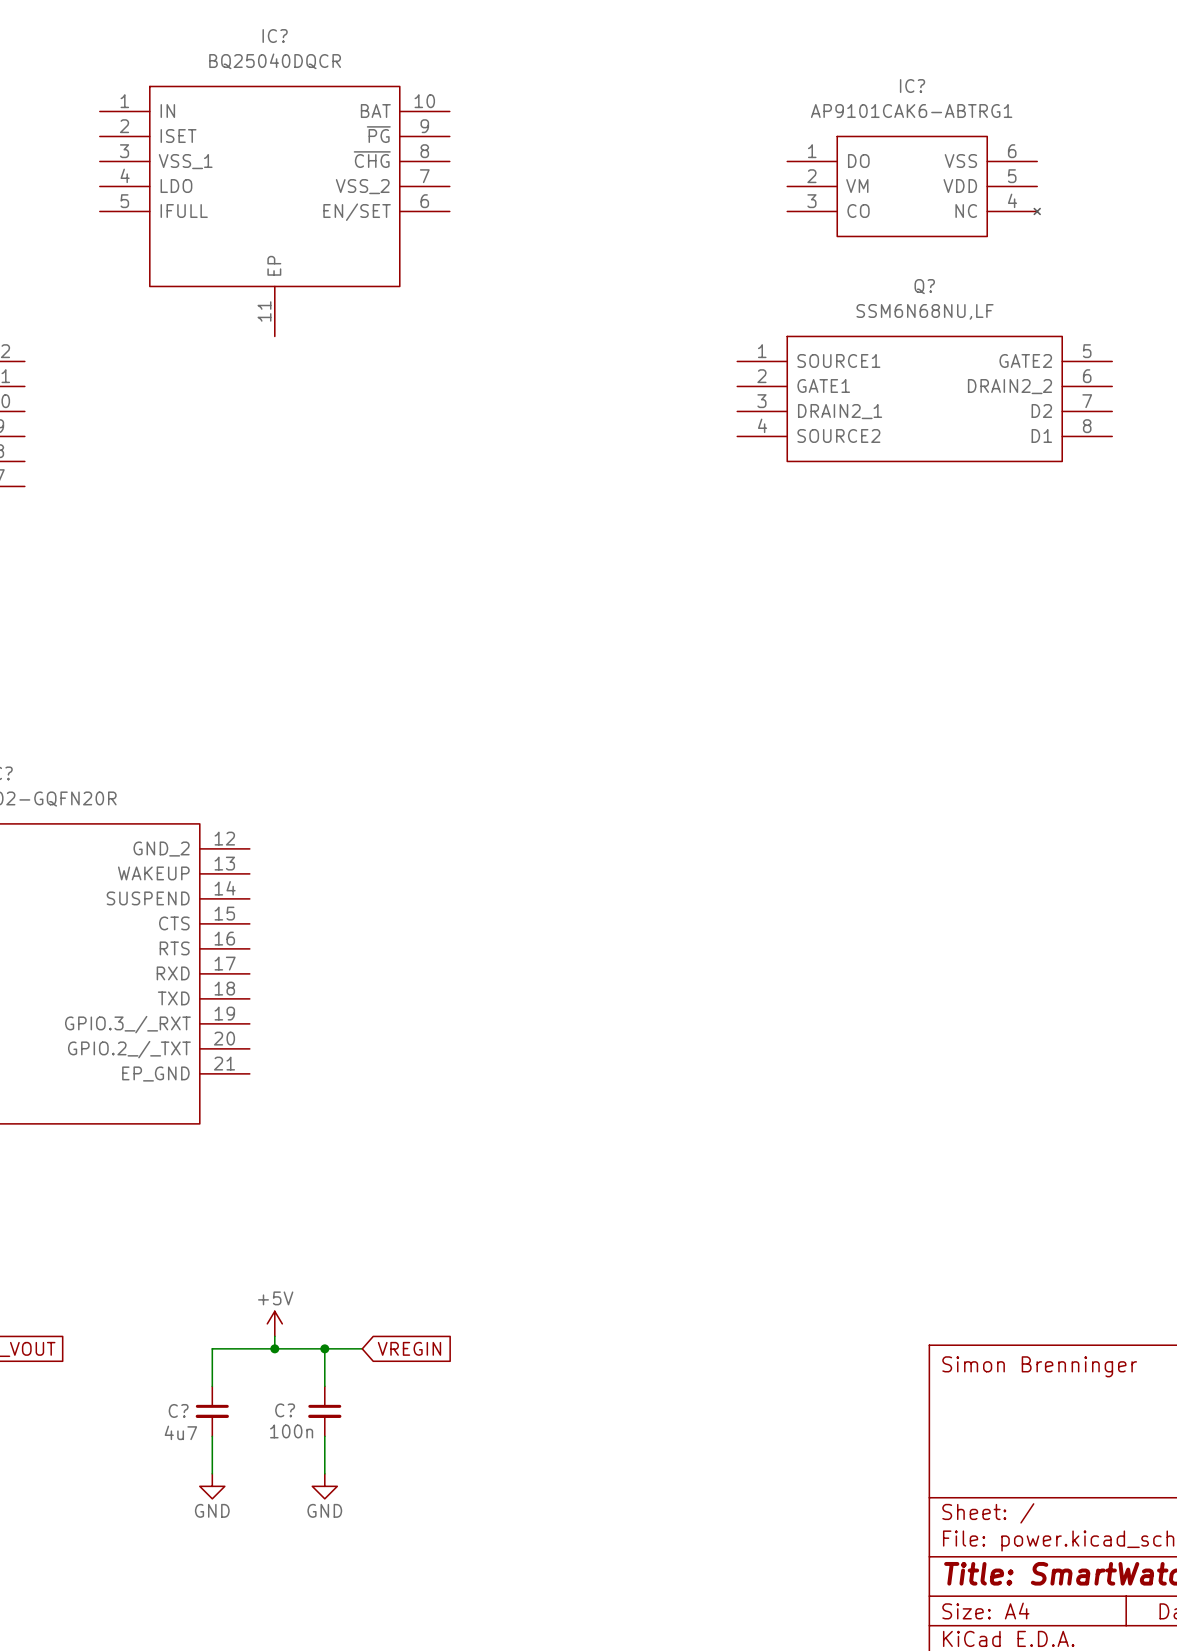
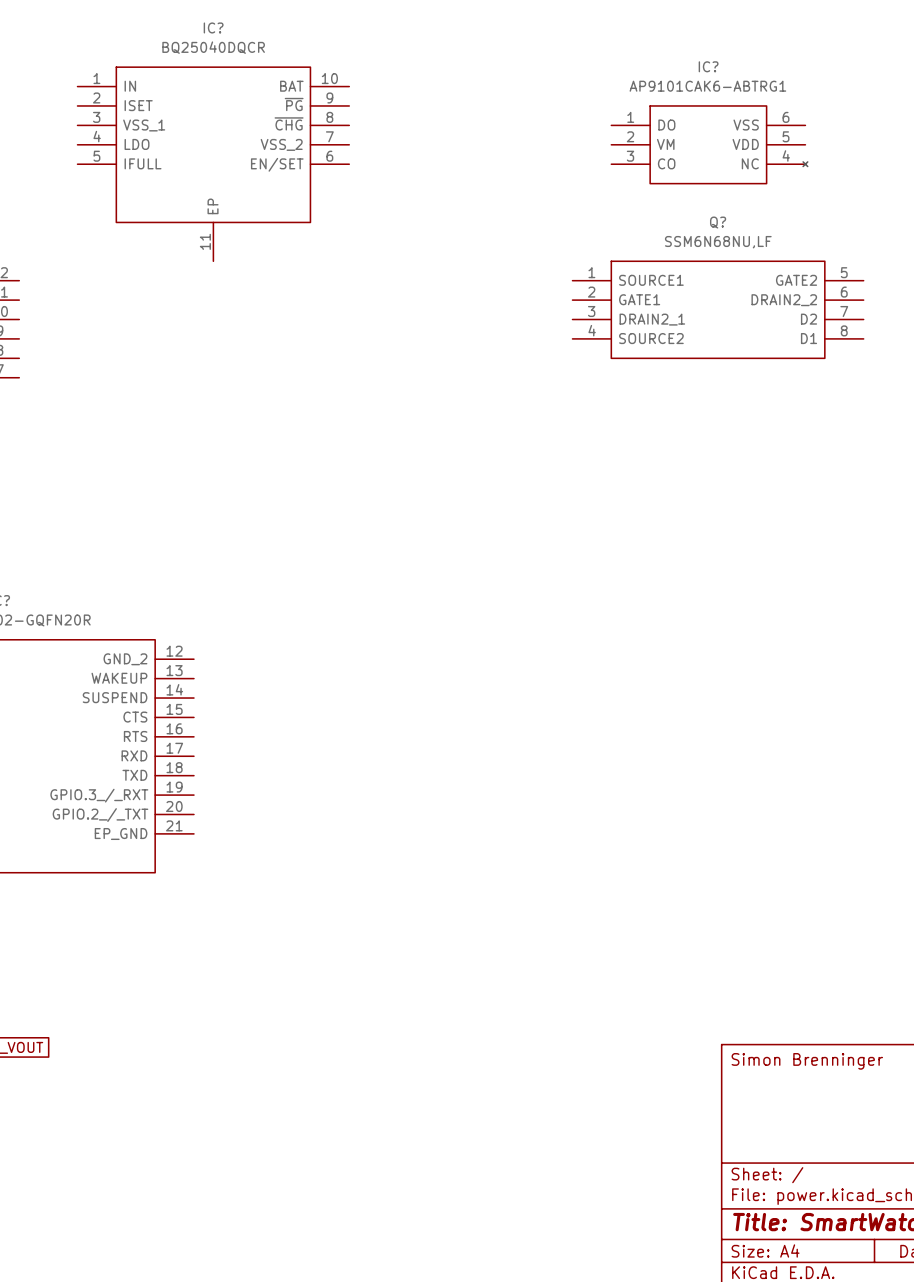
power symbol: +5V (274, 1323) -> none
wire: (274, 1336) (274, 1348) -> none
junction: (274, 1348) -> none
wire: (324, 1348) (324, 1386) -> none
junction: (324, 1348) -> none
wire: (362, 1348) (212, 1348) (212, 1386) -> none
global label: VREGIN (409, 1348) -> none
C?: 4u7 (212, 1411) -> none
C?: 100n (324, 1411) -> none
wire: (212, 1436) (212, 1473) -> none
wire: (324, 1436) (324, 1473) -> none
power symbol: GND (212, 1486) -> none
power symbol: GND (324, 1486) -> none

